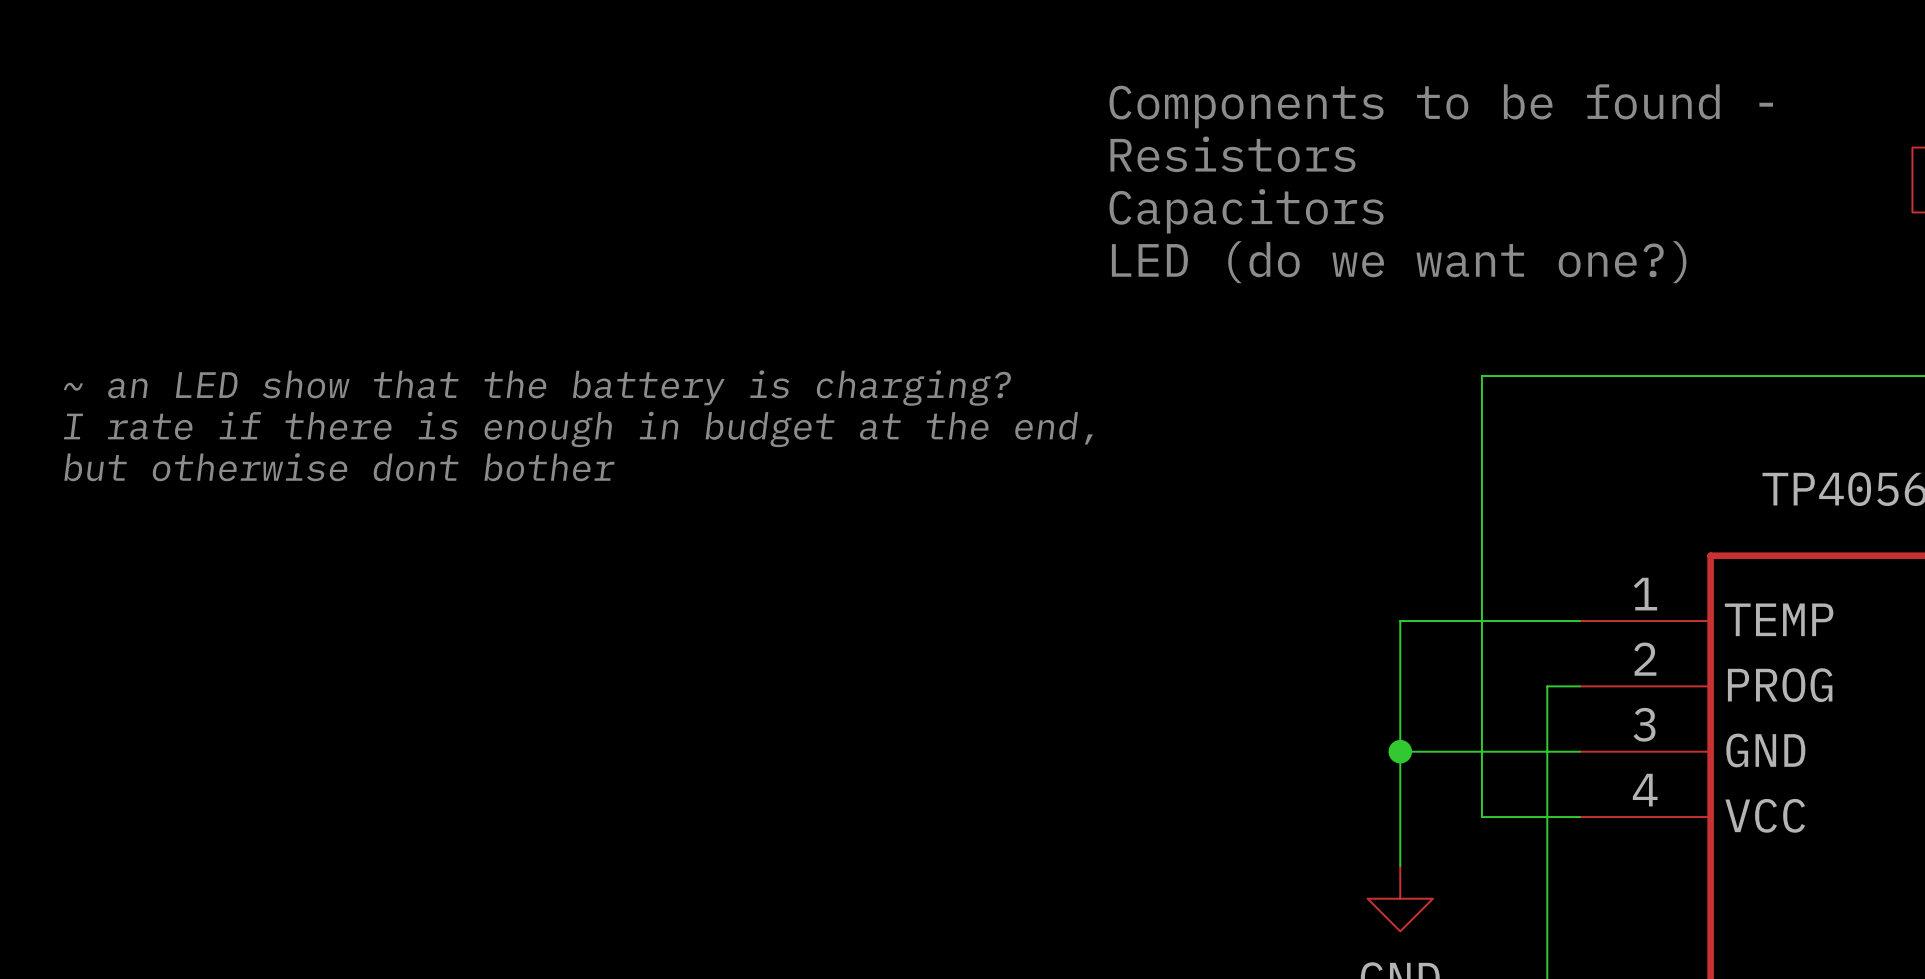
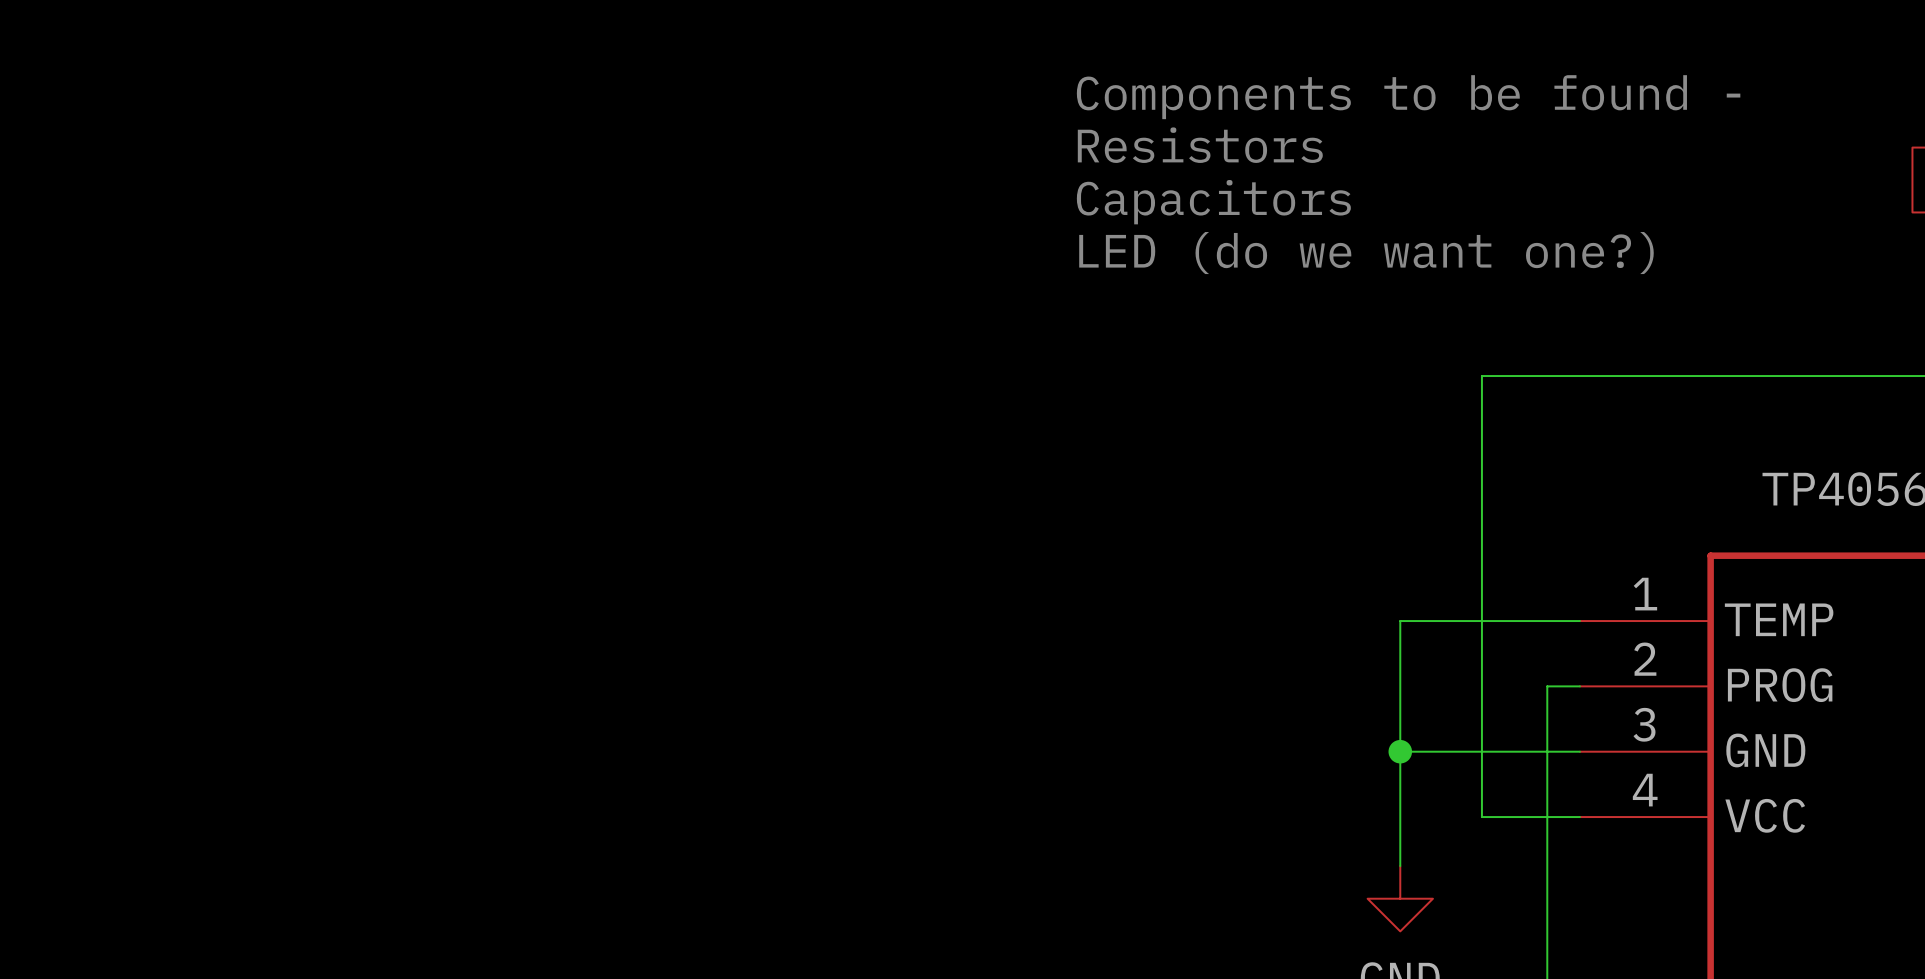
text position: Components to be found - (1441, 106) -> Components to be found - (1408, 97)
text position: Resistors (1232, 154) -> Resistors (1200, 145)
text position: Capacitors (1246, 211) -> Capacitors (1213, 202)
text position: LED (do we want one?) (1399, 262) -> LED (do we want one?) (1366, 253)
text: ~ an LED show that the battery is charging? (537, 388) -> none
text: I rate if there is enough in budget at the end, (578, 429) -> none
text: but otherwise dont bother (339, 467) -> none

